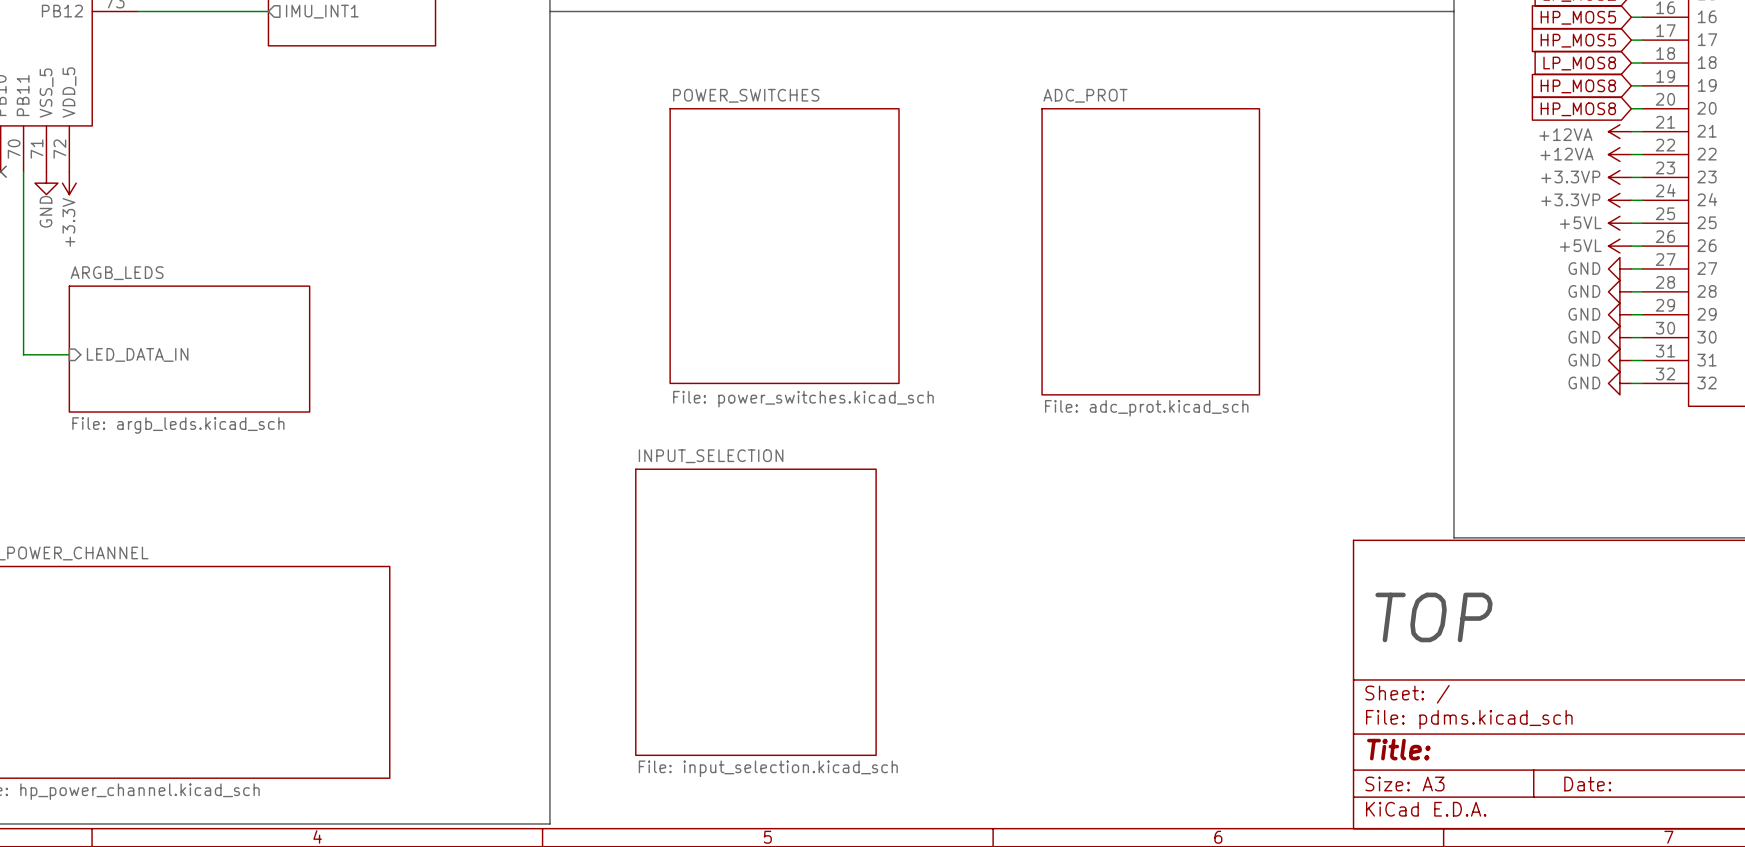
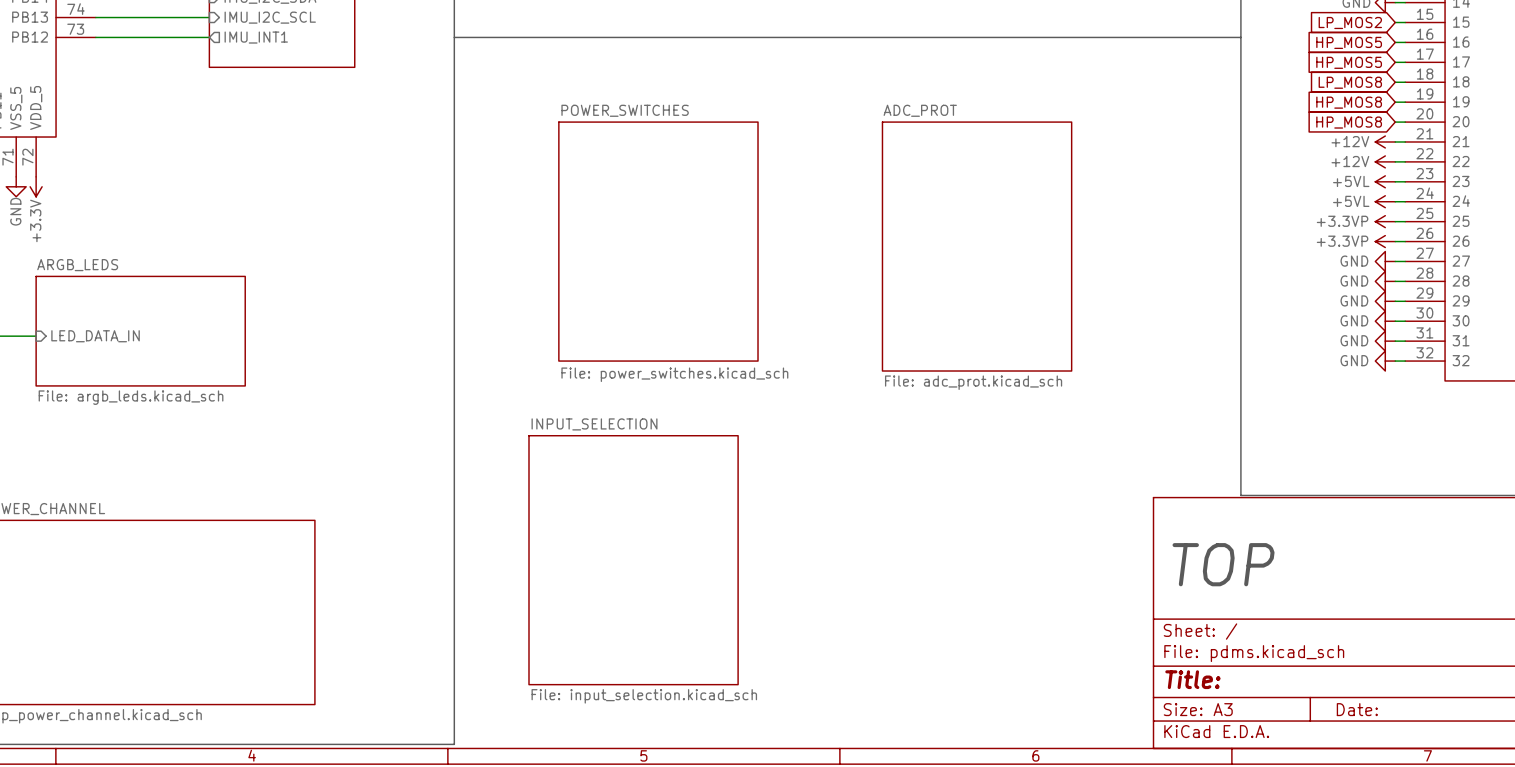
power symbol: +12VA (1619, 131) -> +12V (1385, 141)
power symbol: +12VA (1619, 154) -> +12V (1385, 161)
power symbol: +3.3VP (1619, 177) -> +5VL (1385, 181)
power symbol: +3.3VP (1619, 200) -> +5VL (1385, 201)
power symbol: +5VL (1619, 223) -> +3.3VP (1385, 221)
power symbol: +5VL (1619, 246) -> +3.3VP (1385, 241)

